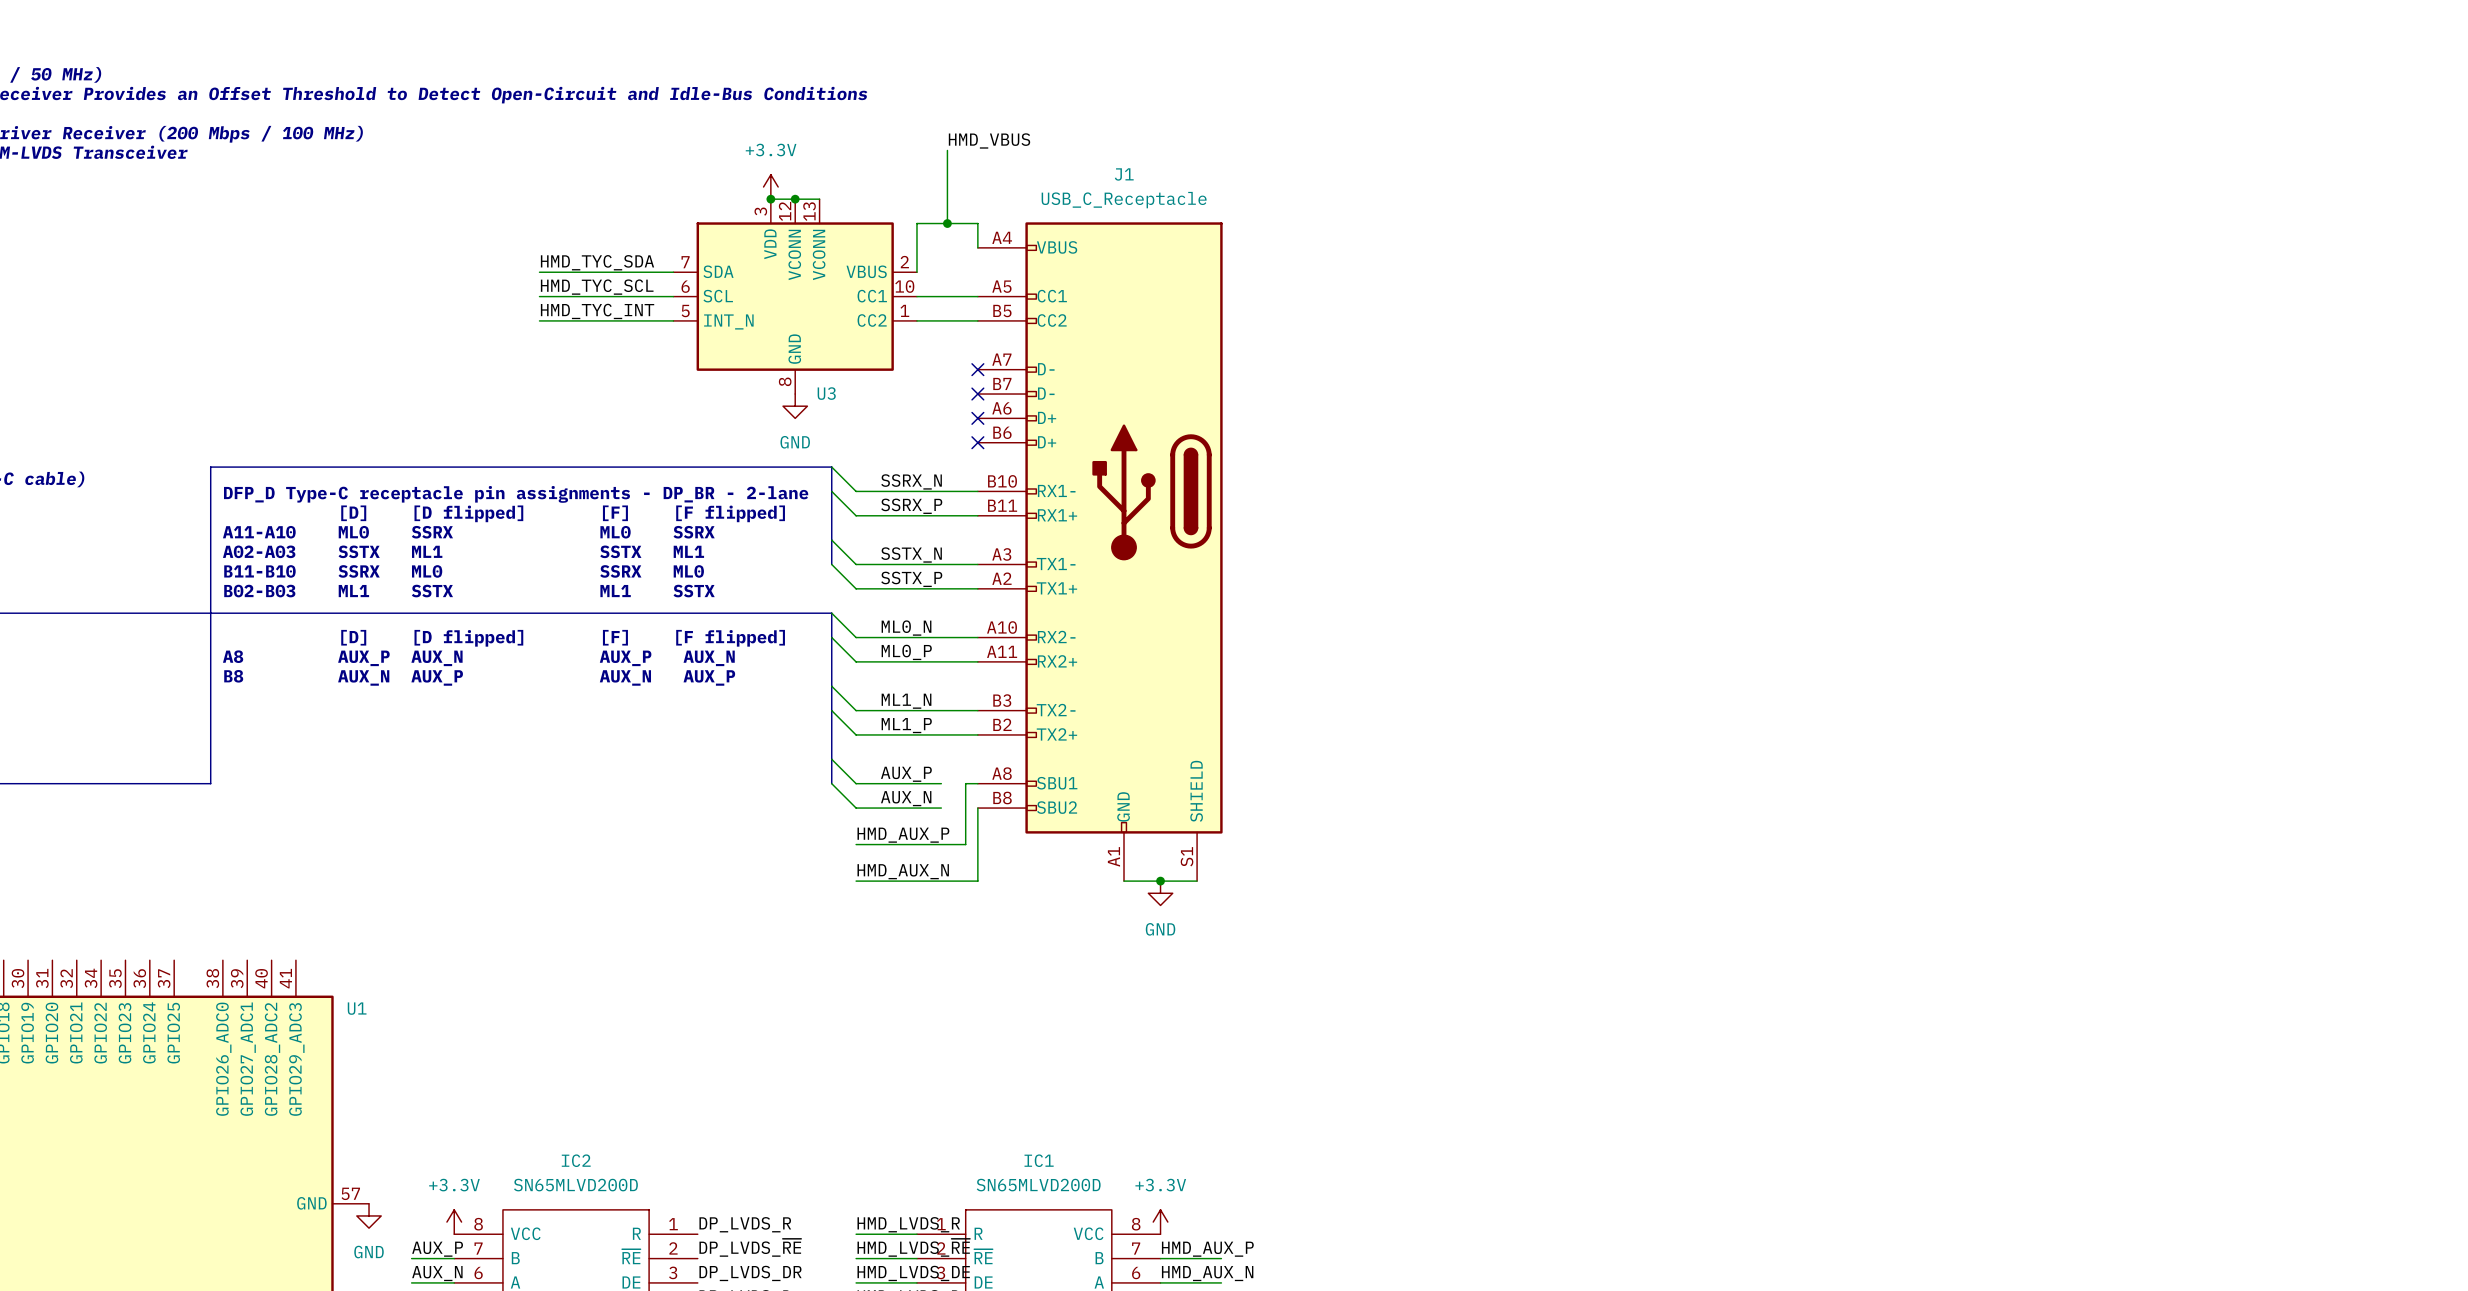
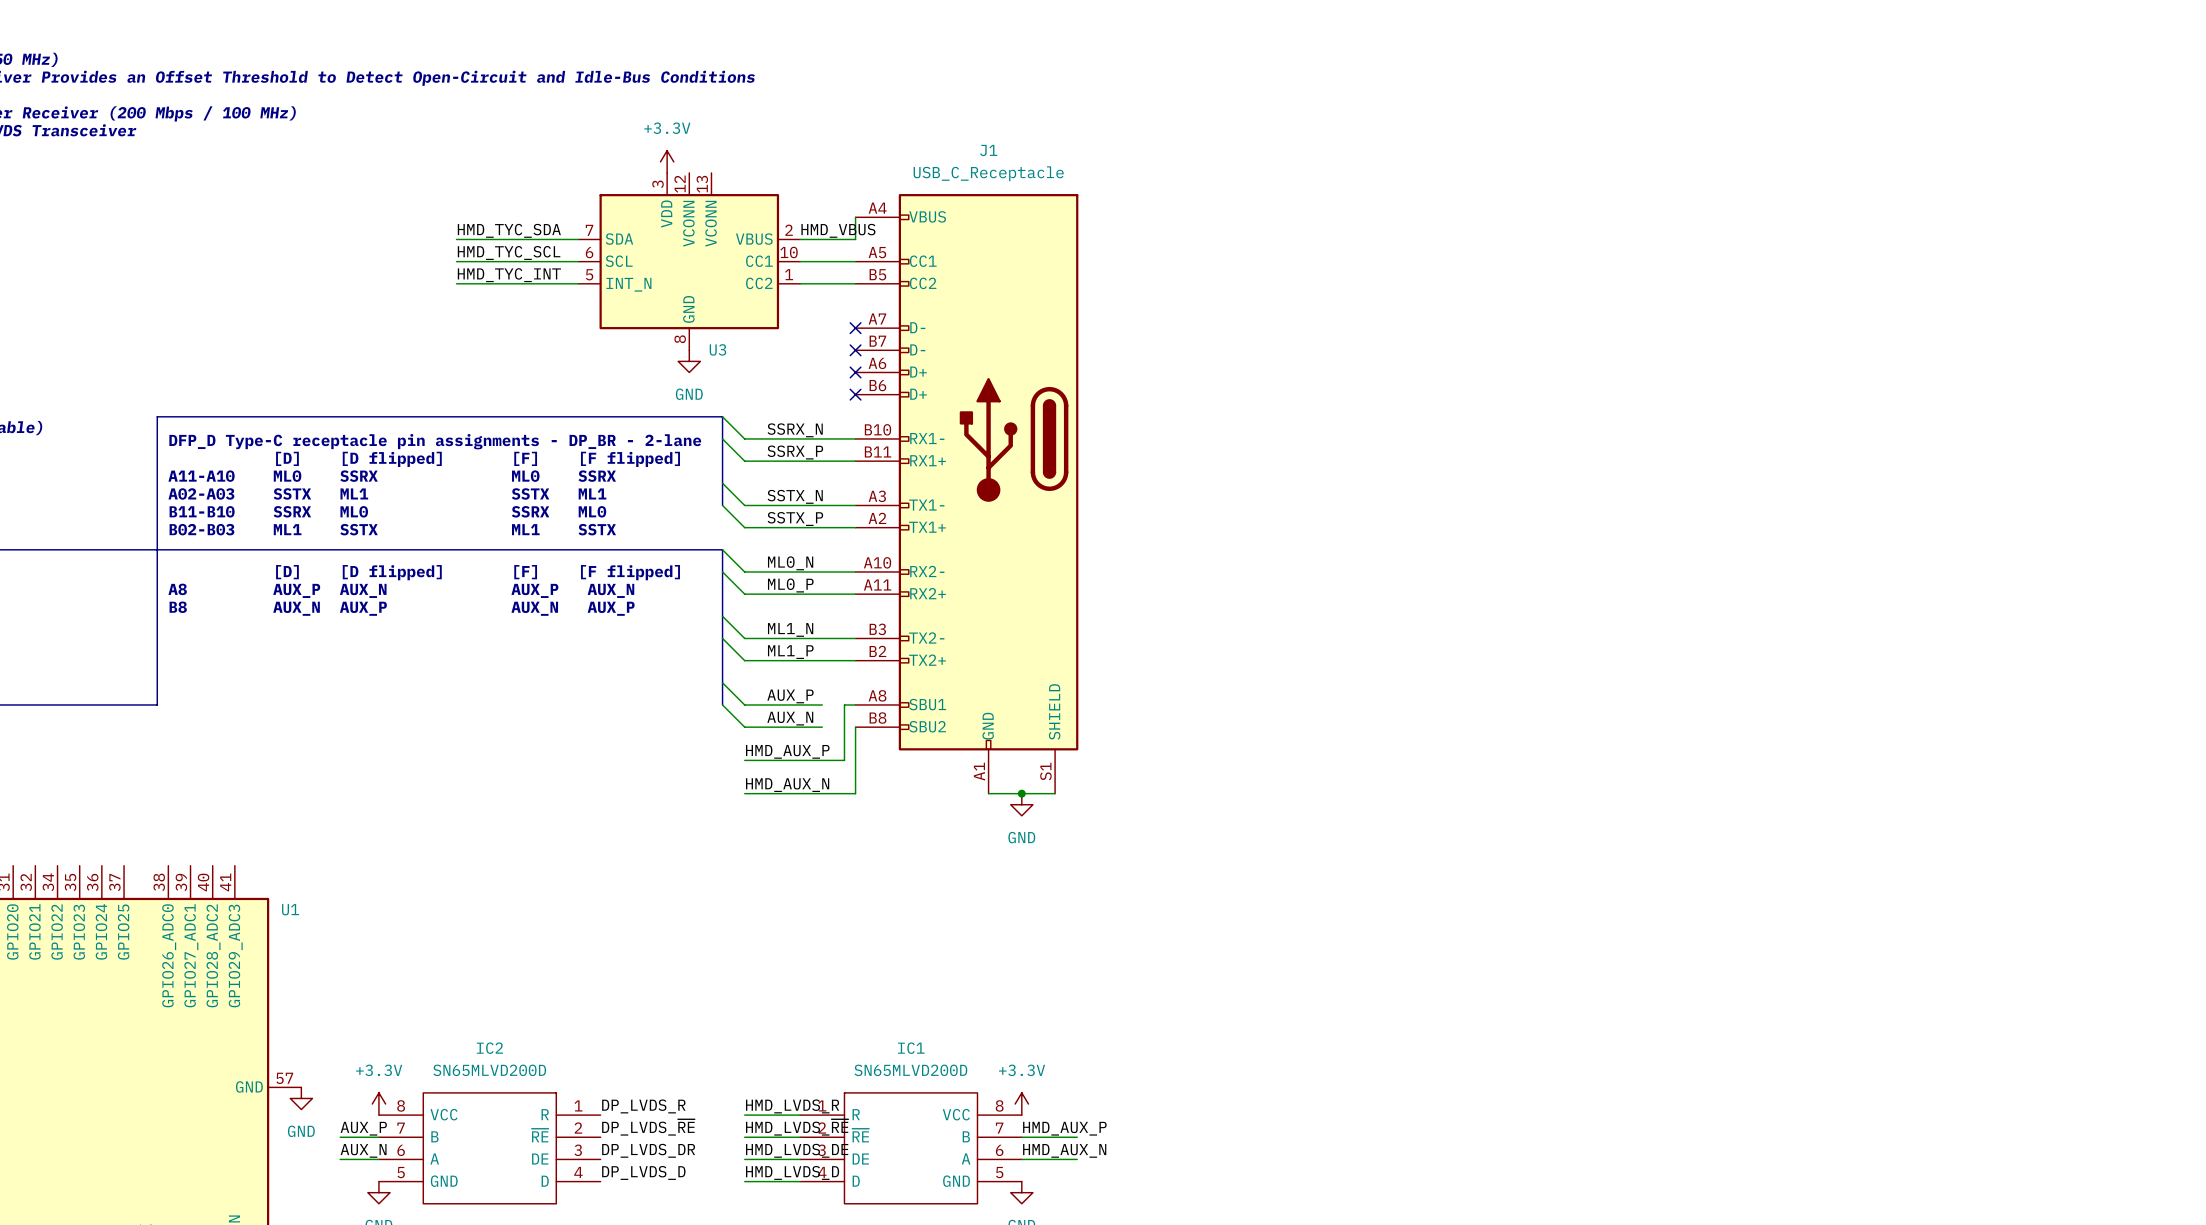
label position: HMD_VBUS (989, 140) -> HMD_VBUS (838, 230)
wire: (947, 150) (947, 223) -> none
wire: (770, 199) (819, 199) -> none
junction: (770, 199) -> none
junction: (795, 199) -> none
junction: (947, 223) -> none
wire: (977, 247) (977, 223) (916, 223) (916, 272) -> (855, 217) (855, 239) (800, 239)

